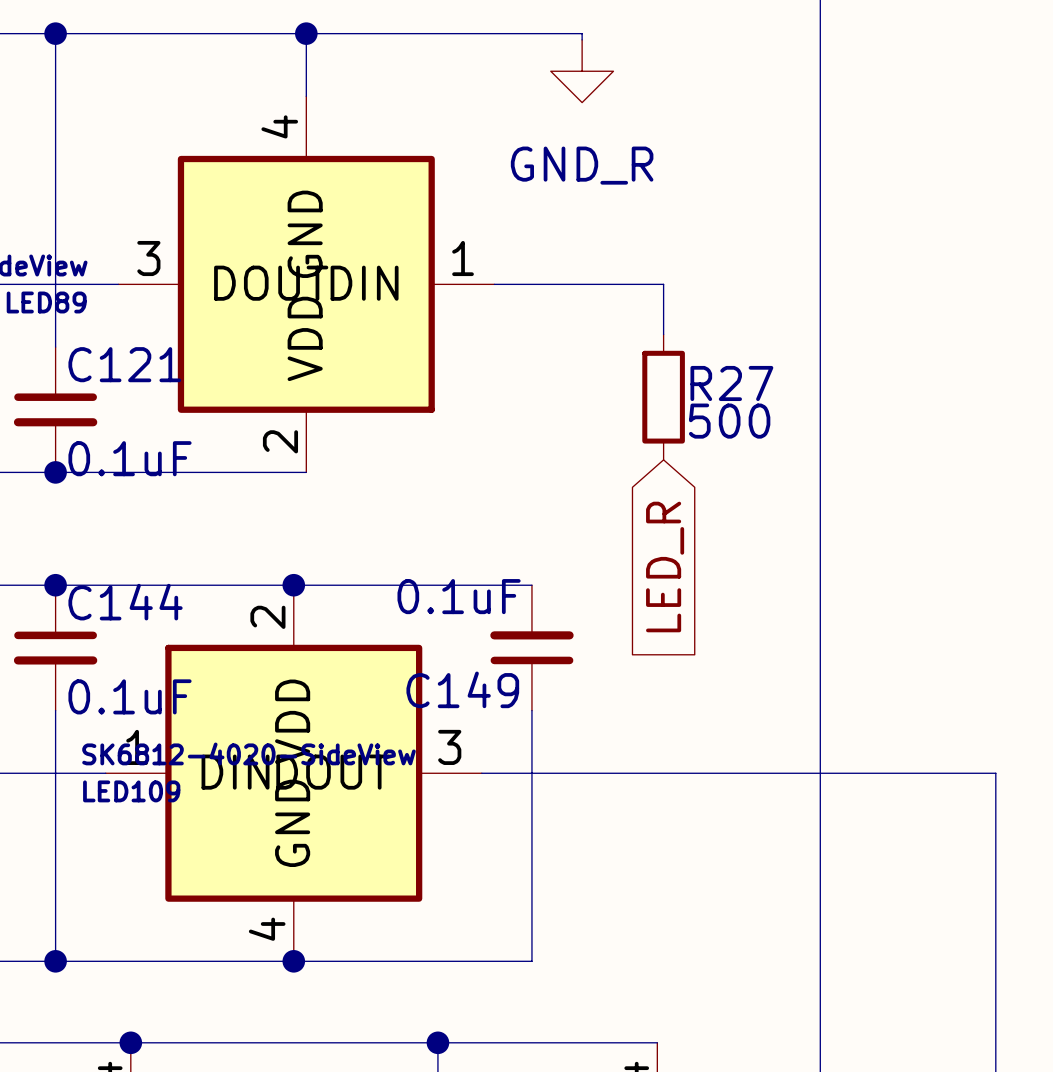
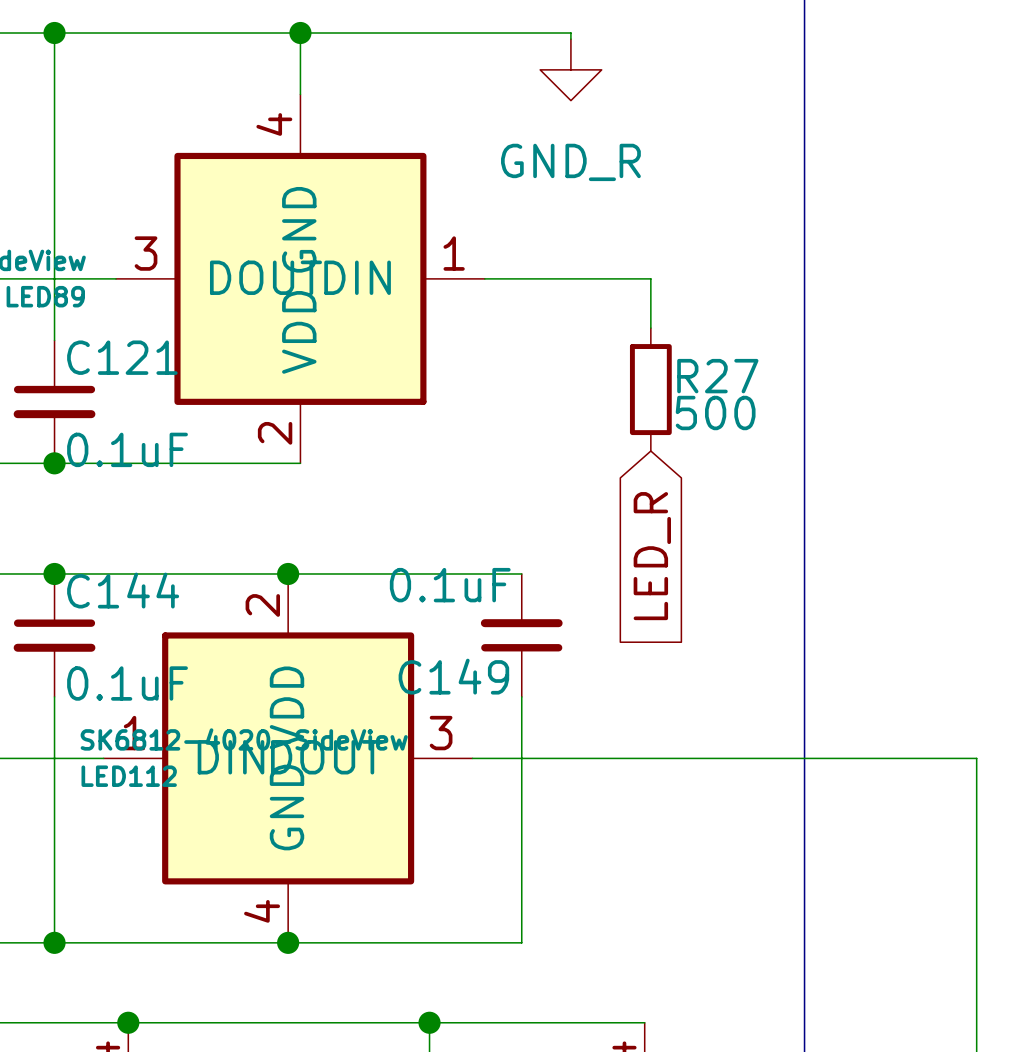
LED109 name: LED109 (131, 791) -> LED112 (129, 776)

